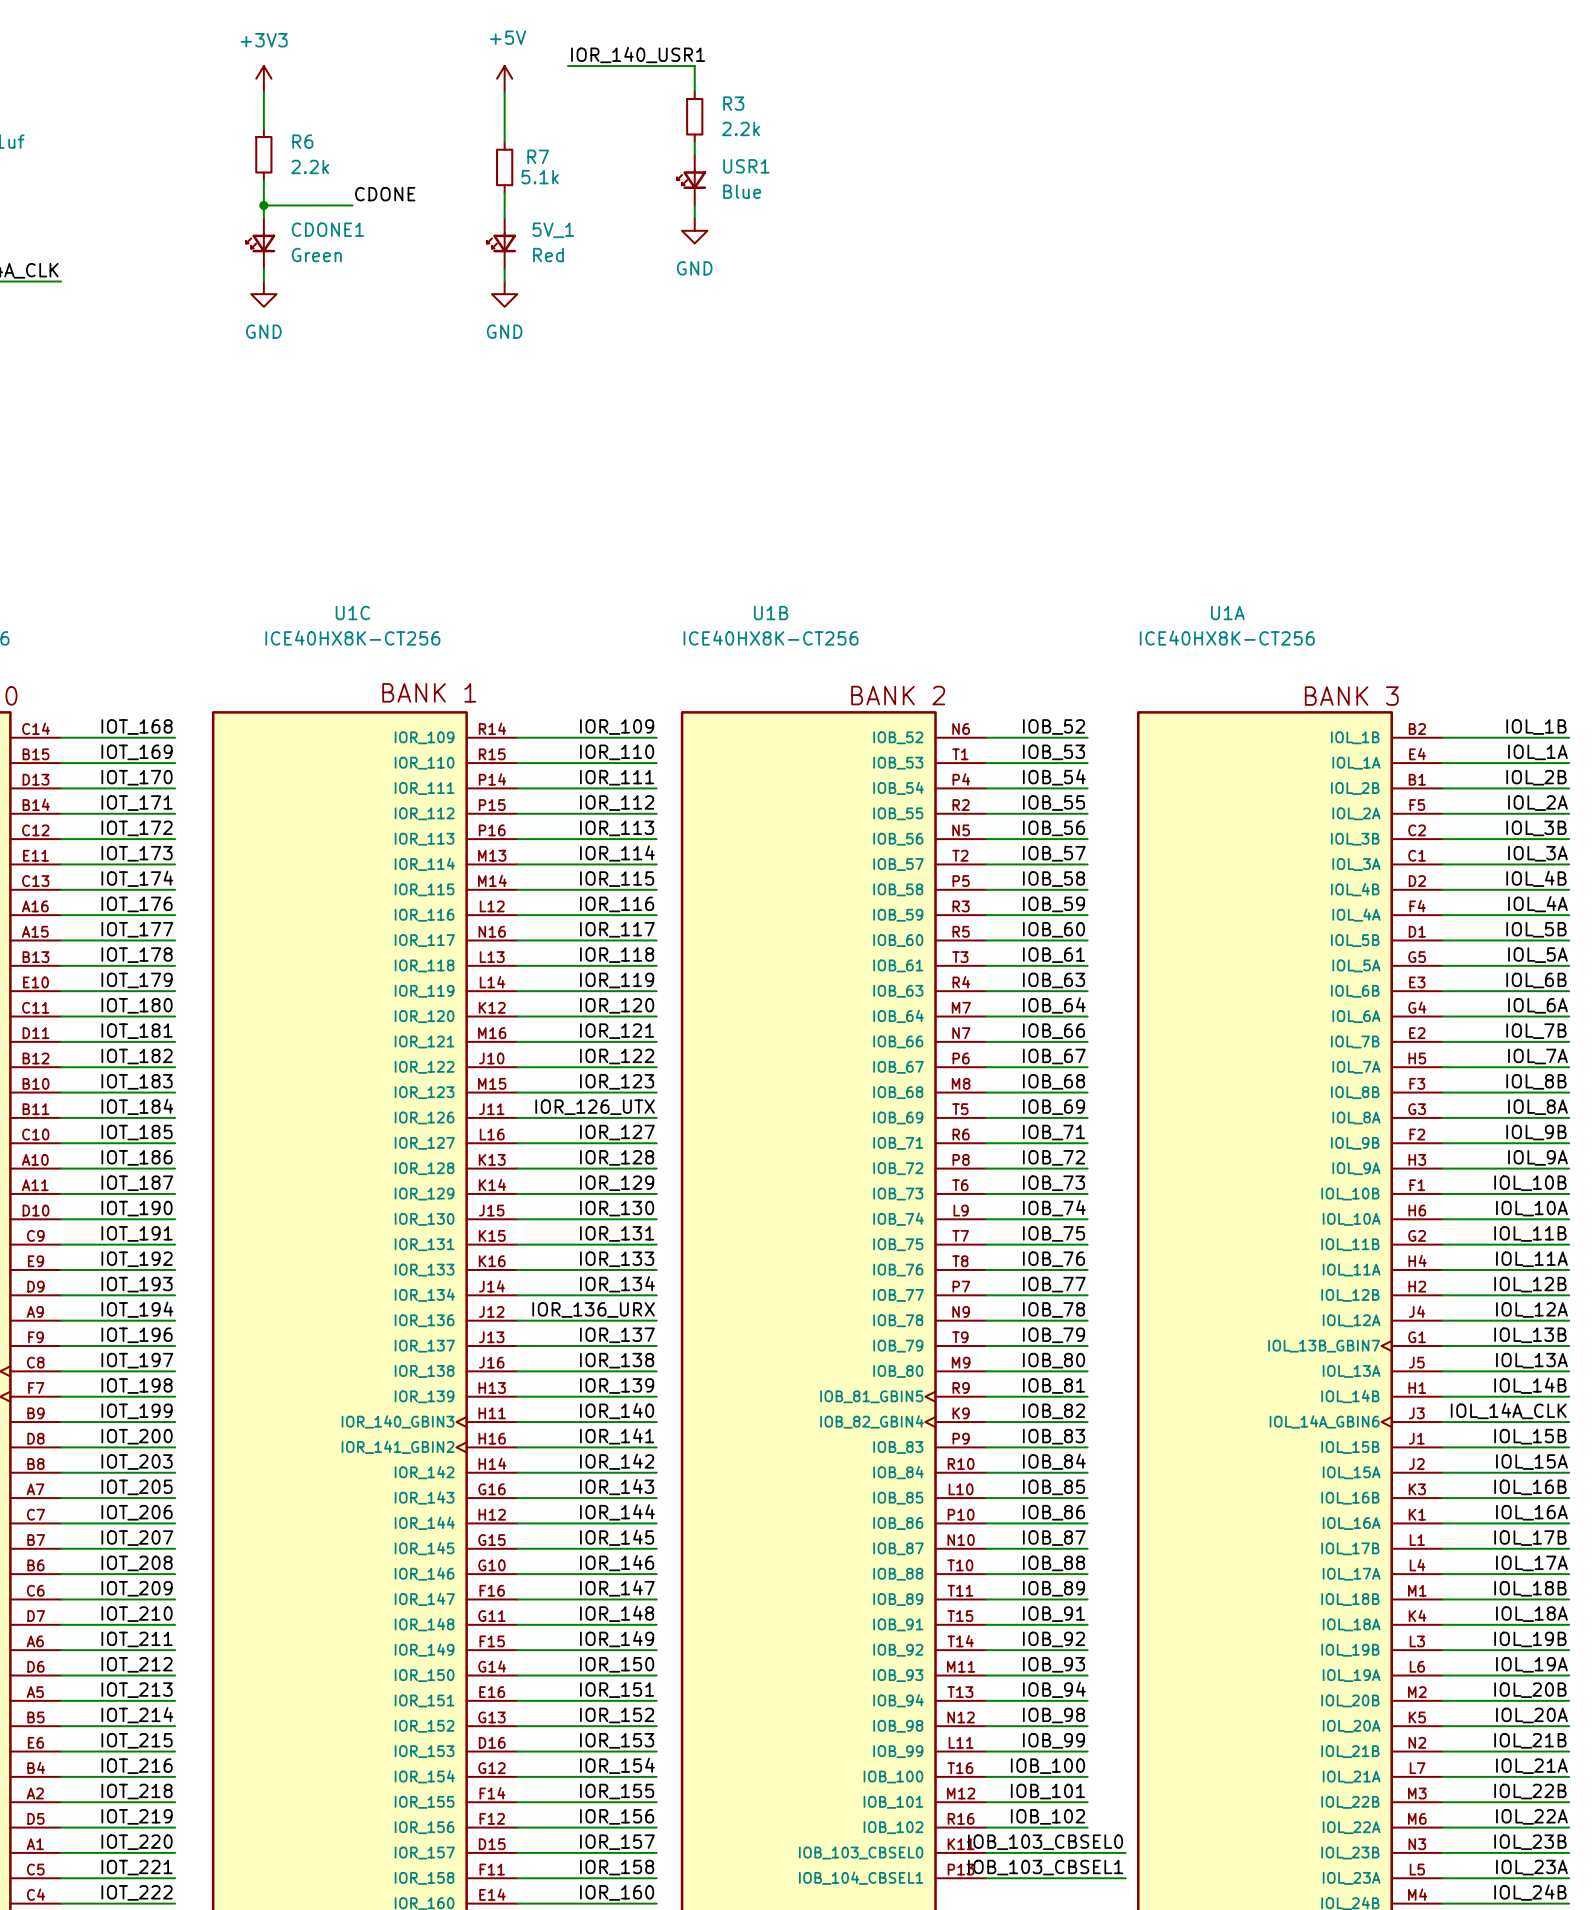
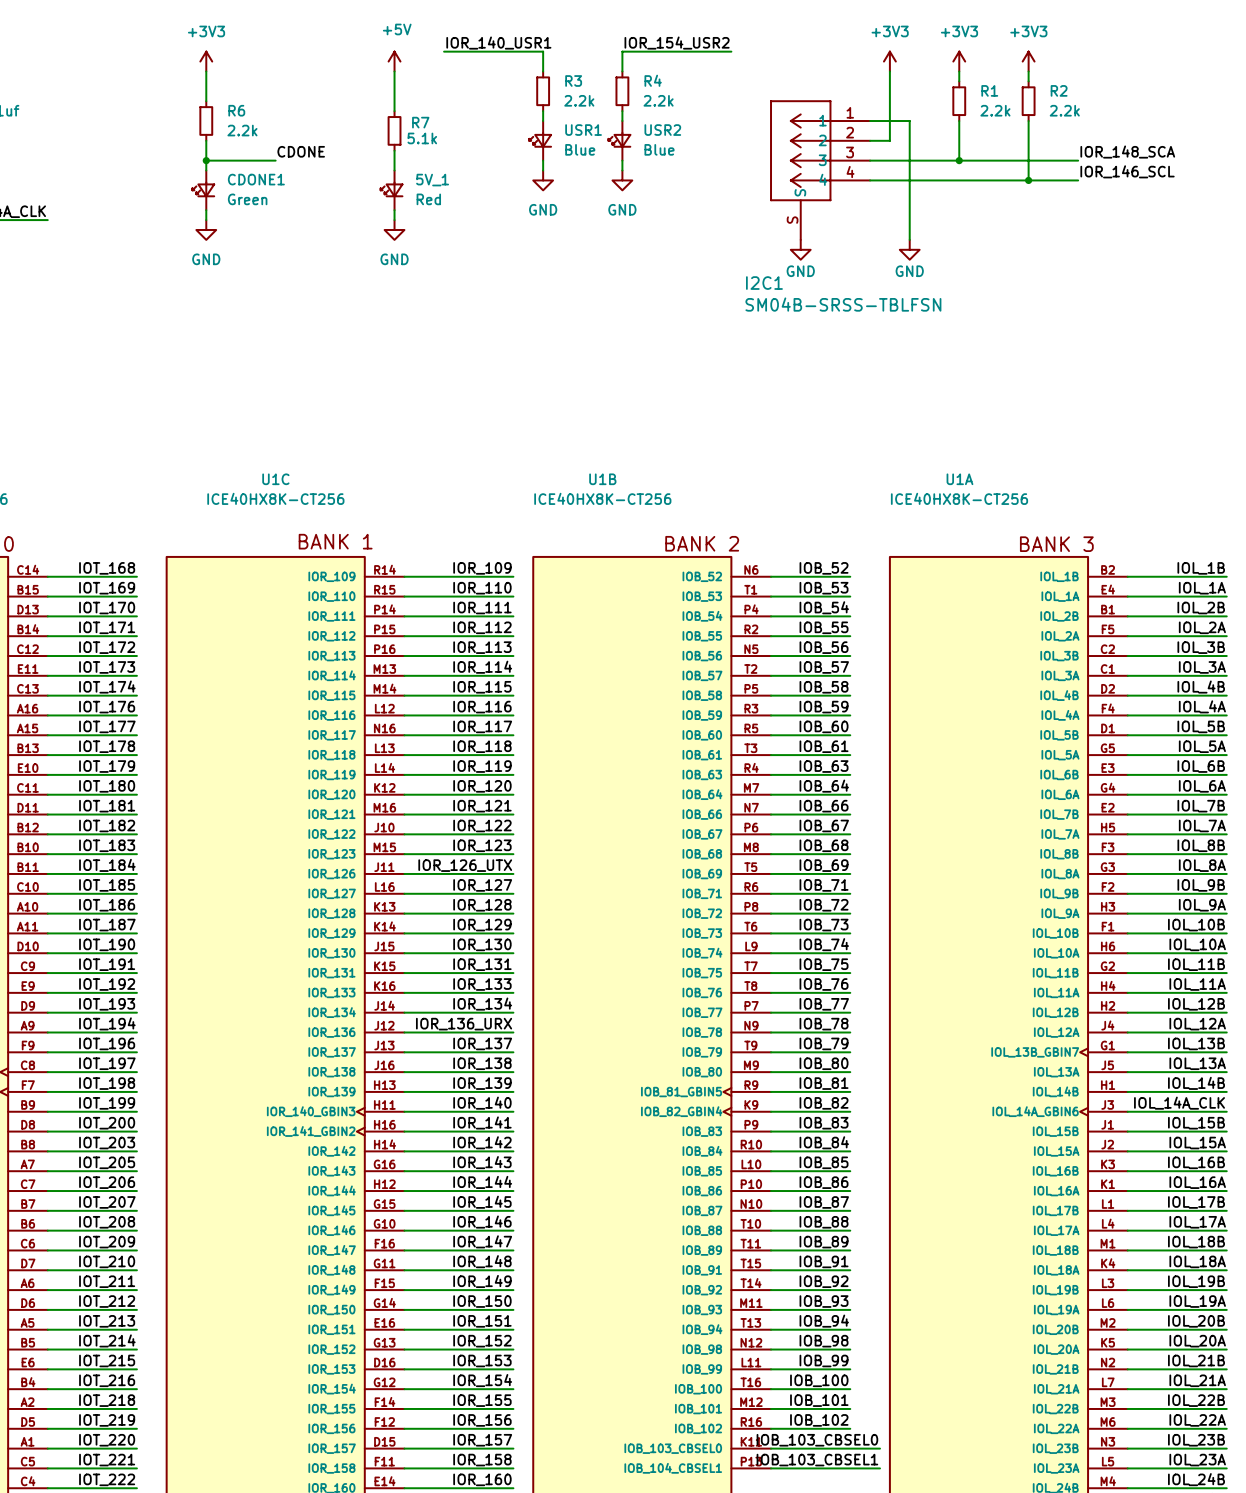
label: none -> IOR_154_USR2 (677, 43)
wire: none -> (731, 51) (622, 51) (622, 71)
power symbol: none -> +3V3 (889, 61)
power symbol: none -> +3V3 (959, 61)
power symbol: none -> +3V3 (1028, 61)
wire: none -> (889, 71) (889, 140) (870, 140)
wire: none -> (959, 71) (959, 81)
wire: none -> (1028, 71) (1028, 81)
R4: none -> 2.2k (622, 91)
R1: none -> 2.2k (959, 101)
R2: none -> 2.2k (1028, 101)
wire: none -> (622, 111) (622, 121)
wire: none -> (870, 121) (909, 121) (909, 239)
wire: none -> (959, 121) (959, 160)
wire: none -> (1028, 121) (1028, 180)
USR2: none -> Blue (619, 140)
label: none -> IOR_148_SCA (1127, 152)
wire: none -> (622, 160) (622, 170)
wire: none -> (870, 160) (1078, 160)
junction: none -> (959, 160)
I2C1: none -> SM04B-SRSS-TBLFSN (820, 170)
label: none -> IOR_146_SCL (1127, 171)
power symbol: none -> GND (622, 180)
wire: none -> (870, 180) (1078, 180)
junction: none -> (1028, 180)
power symbol: none -> GND (800, 249)
power symbol: none -> GND (909, 249)

